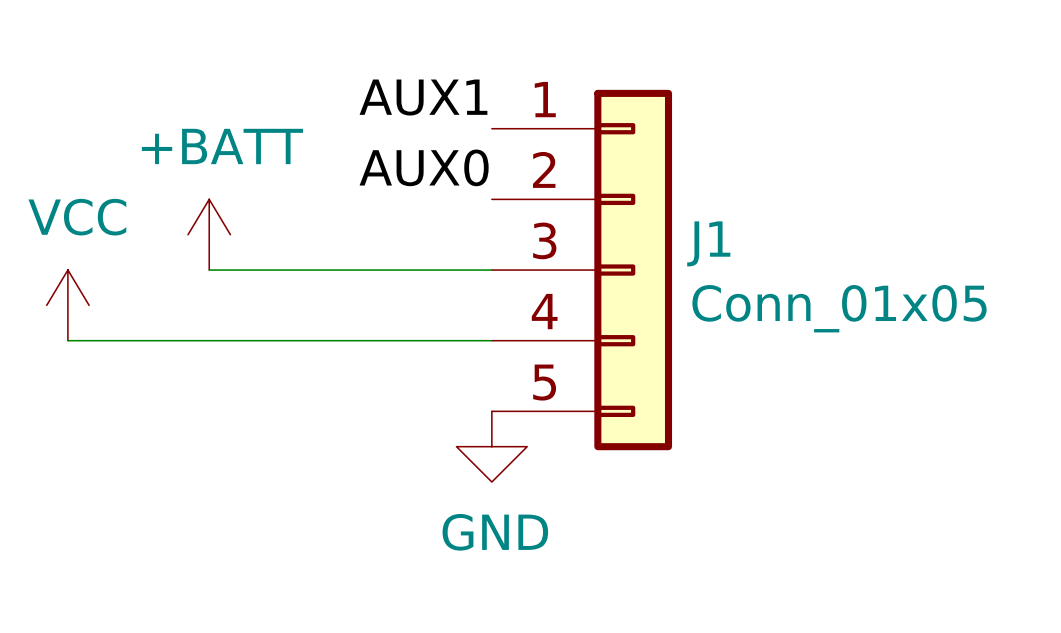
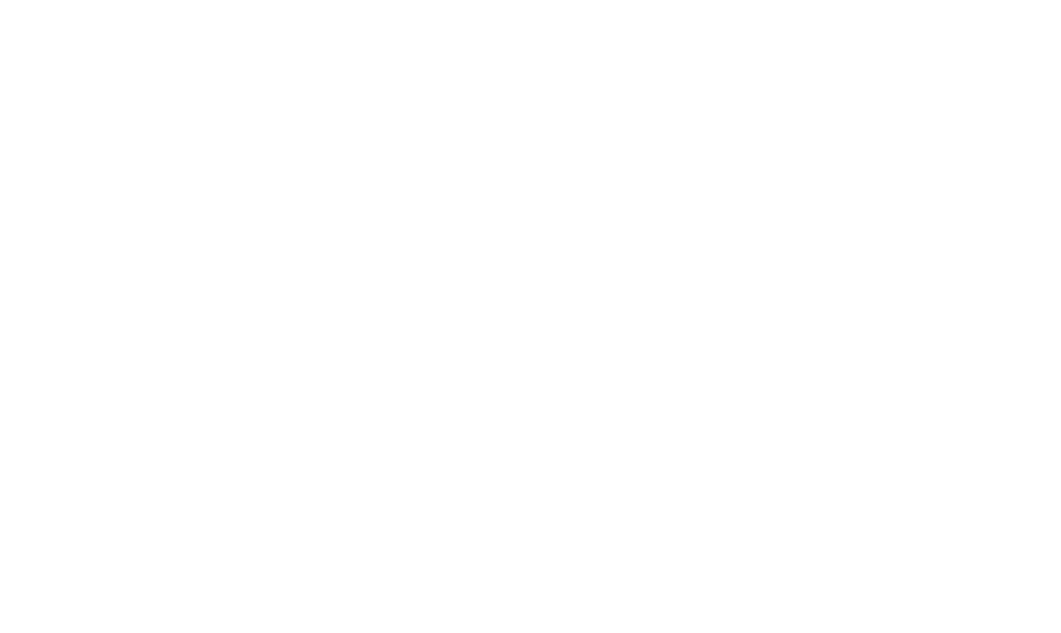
label: AUX1 (423, 97) -> none
label: AUX0 (424, 167) -> none
power symbol: +BATT (209, 234) -> none
wire: (209, 270) (491, 270) -> none
J1: Conn_01x05 (581, 270) -> none
power symbol: VCC (67, 305) -> none
wire: (67, 340) (491, 340) -> none
power symbol: GND (491, 446) -> none

